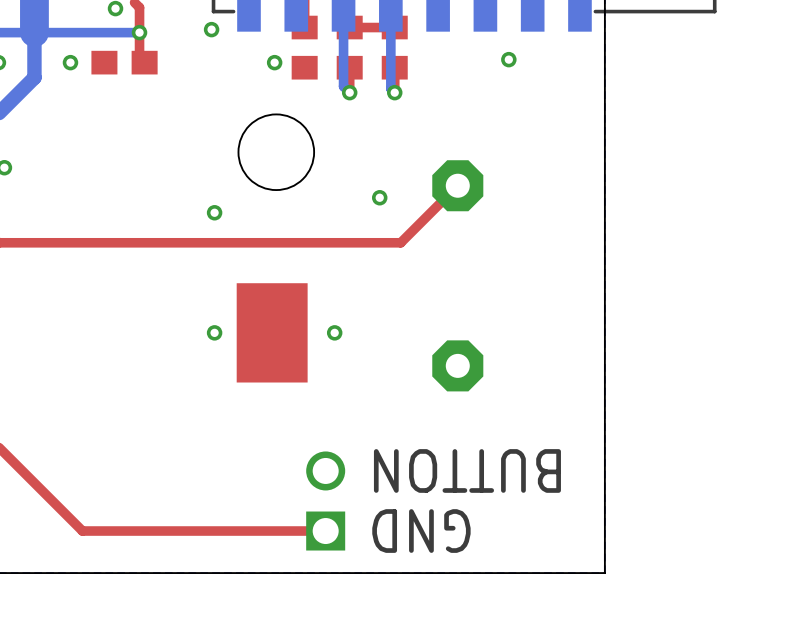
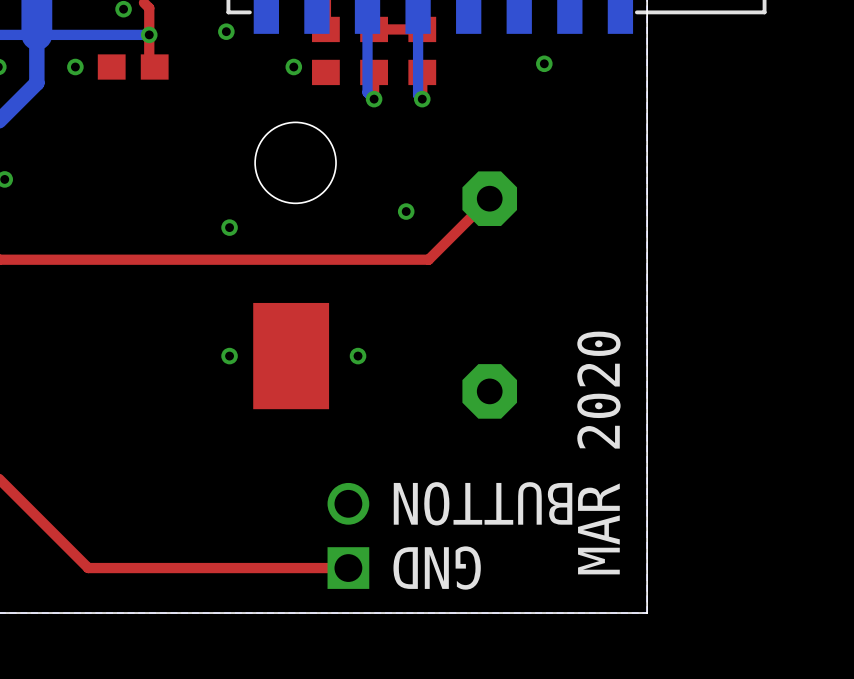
text: none -> MAR 2020 (598, 453)

